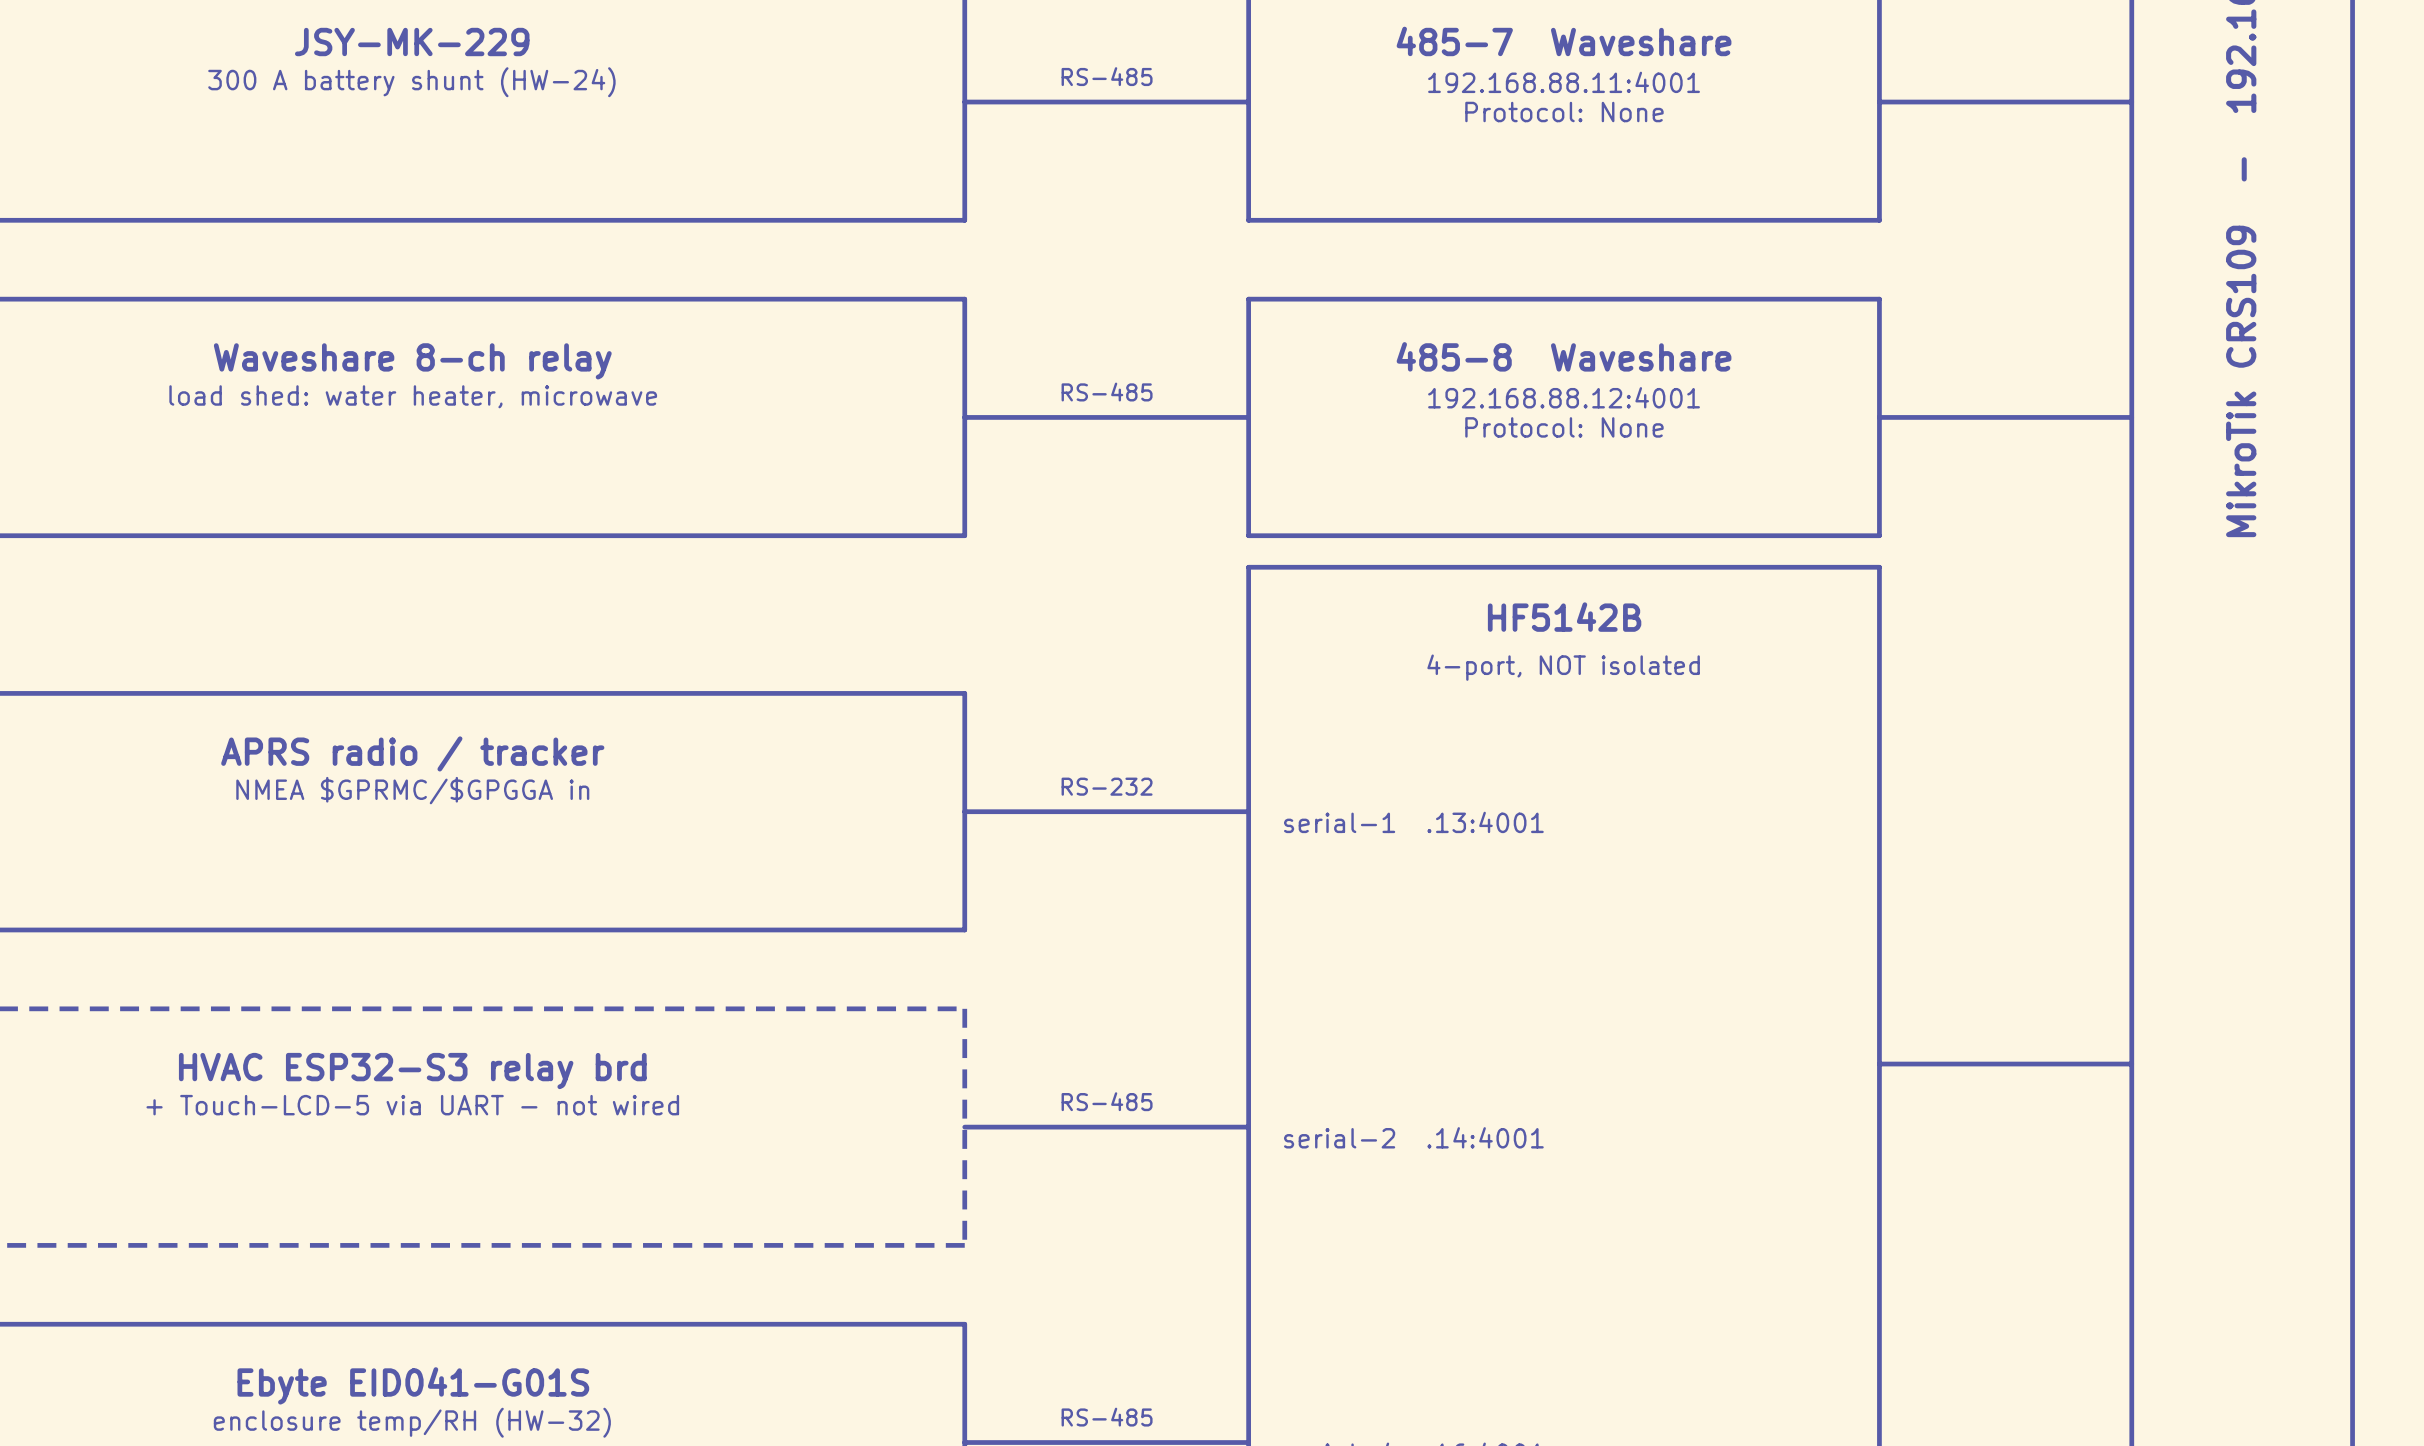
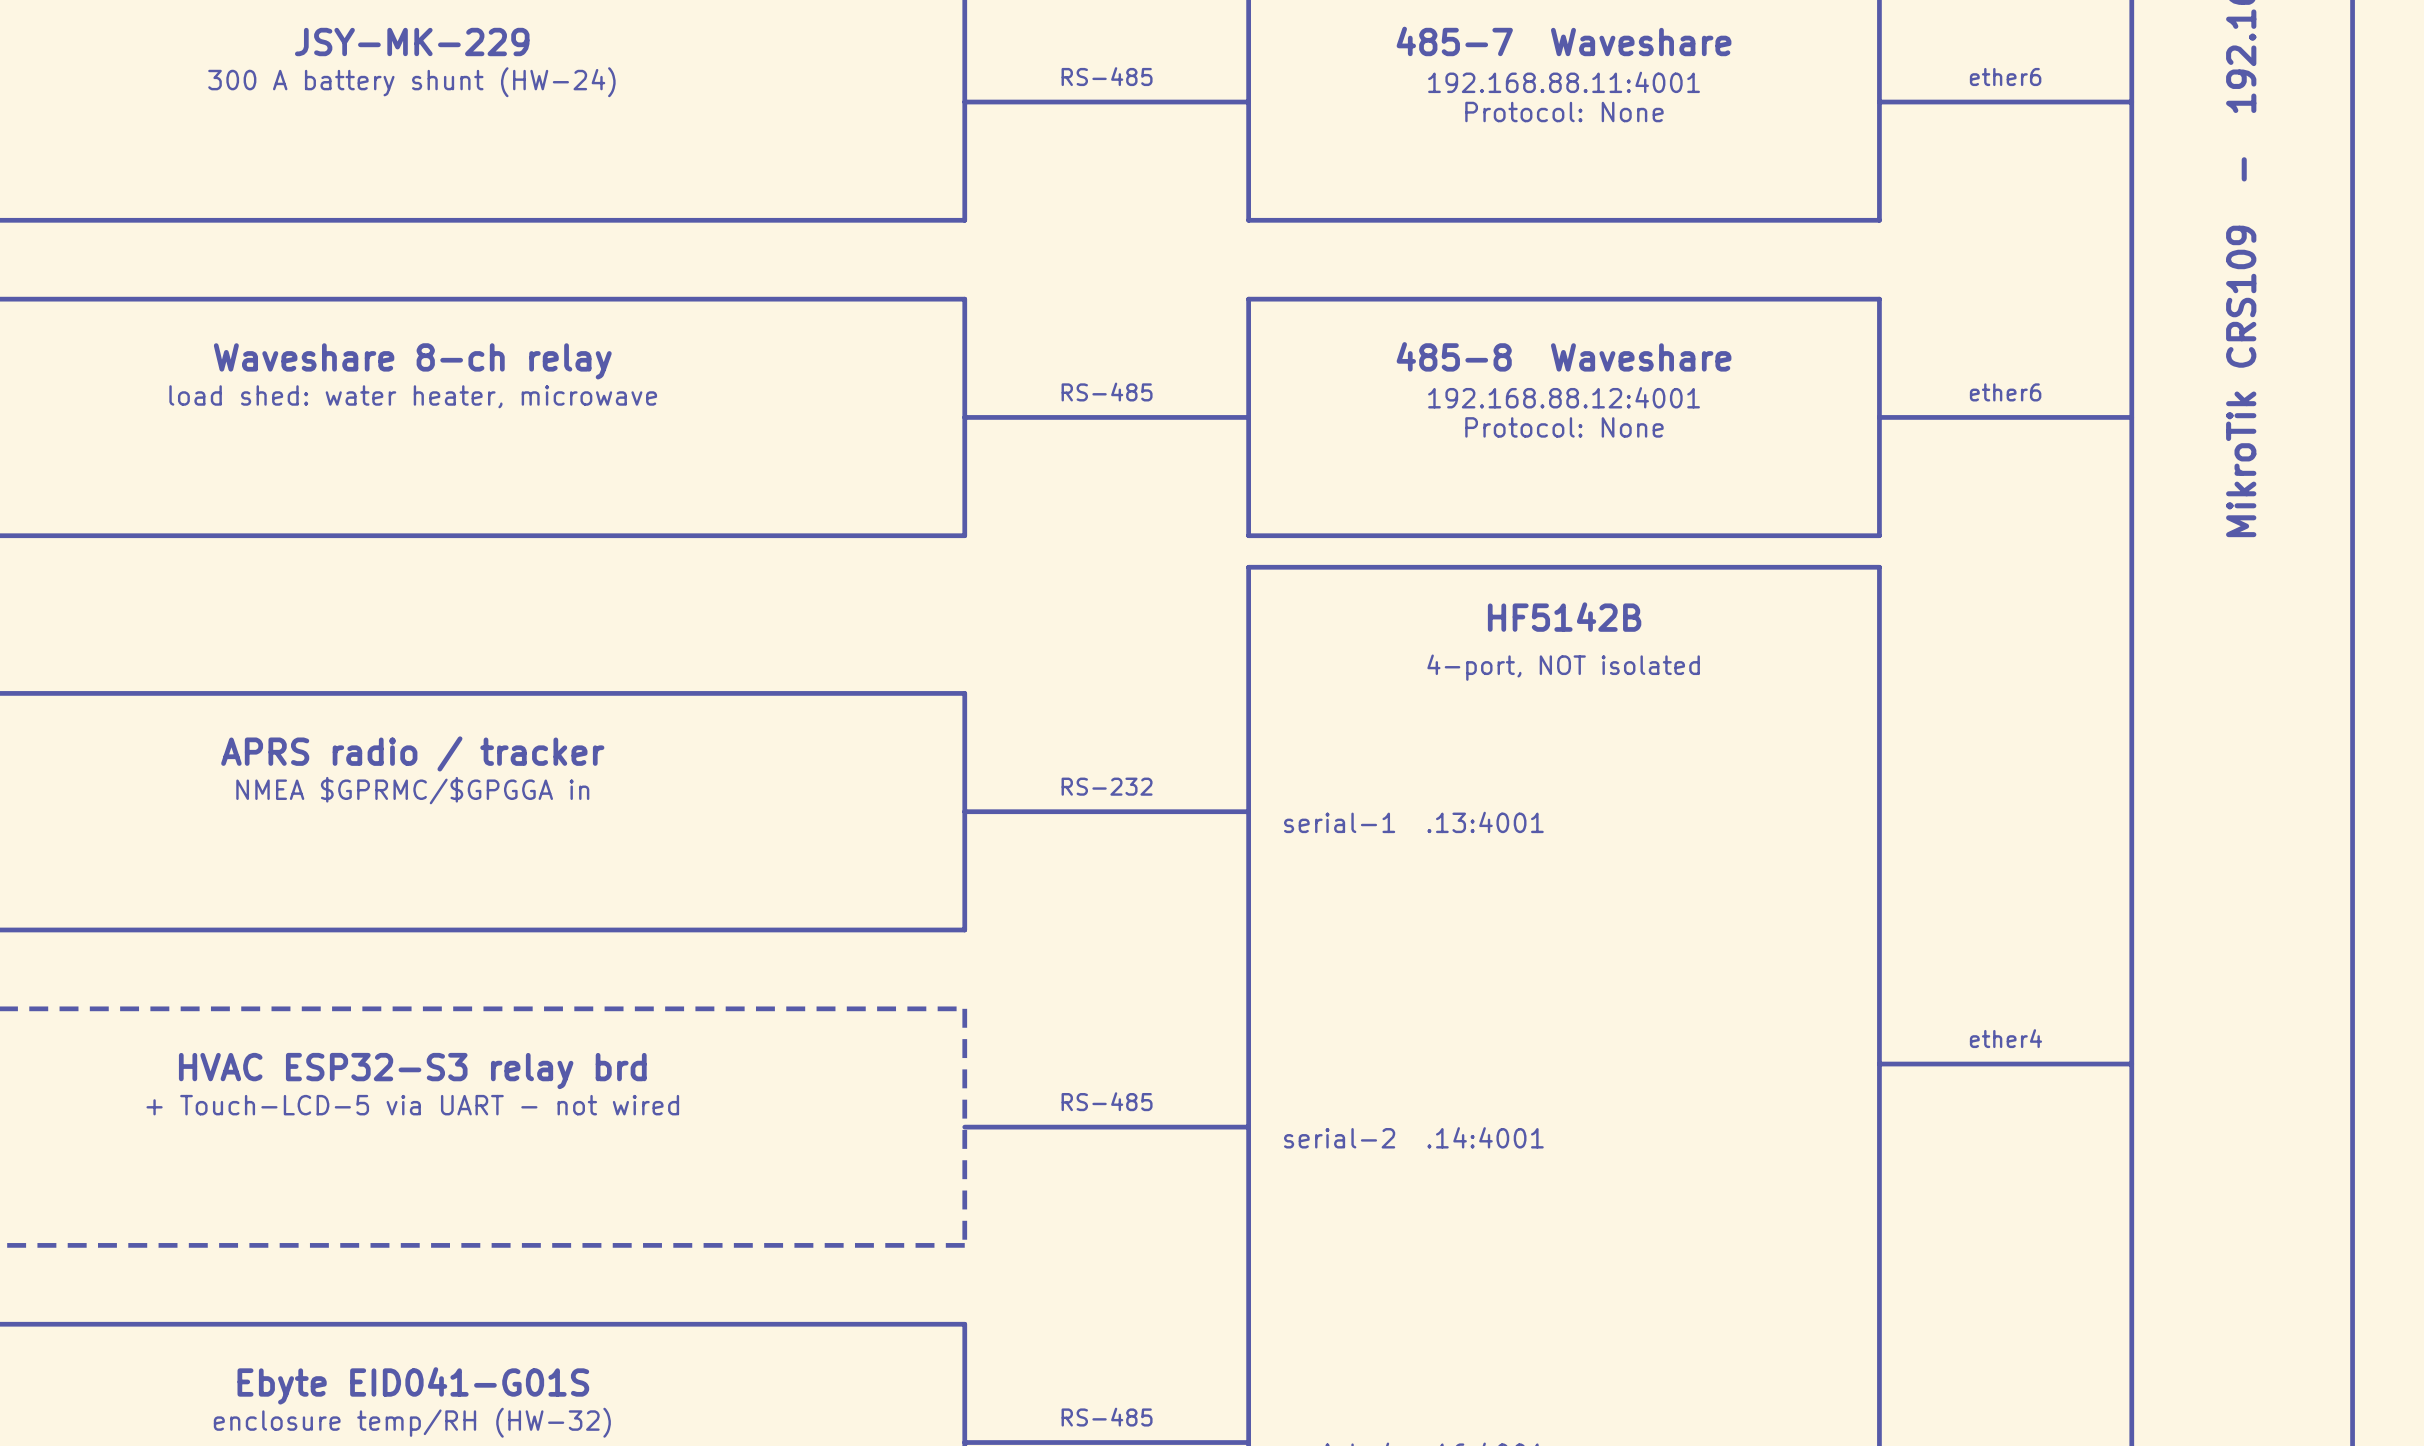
text: none -> ether6 (2005, 76)
text: none -> ether6 (2005, 392)
text: none -> ether4 (2005, 1038)

